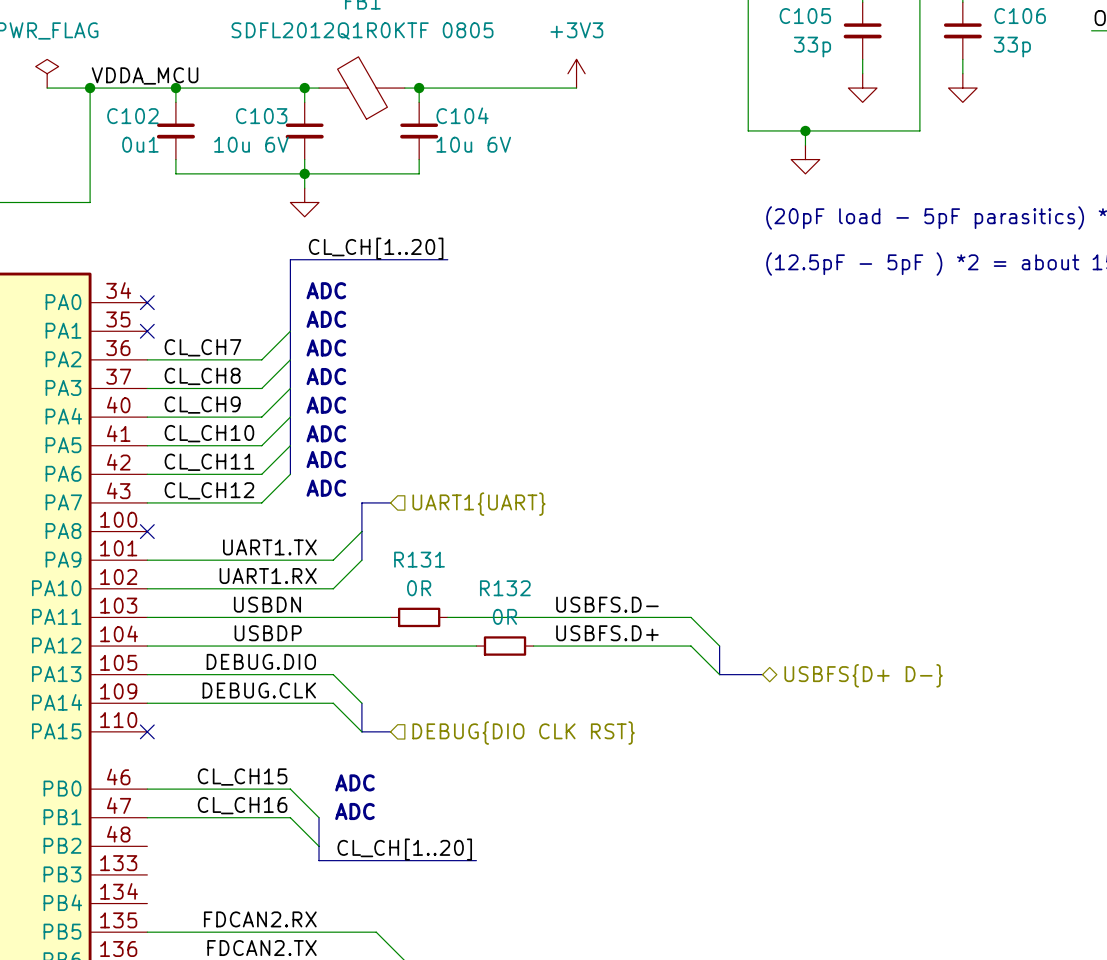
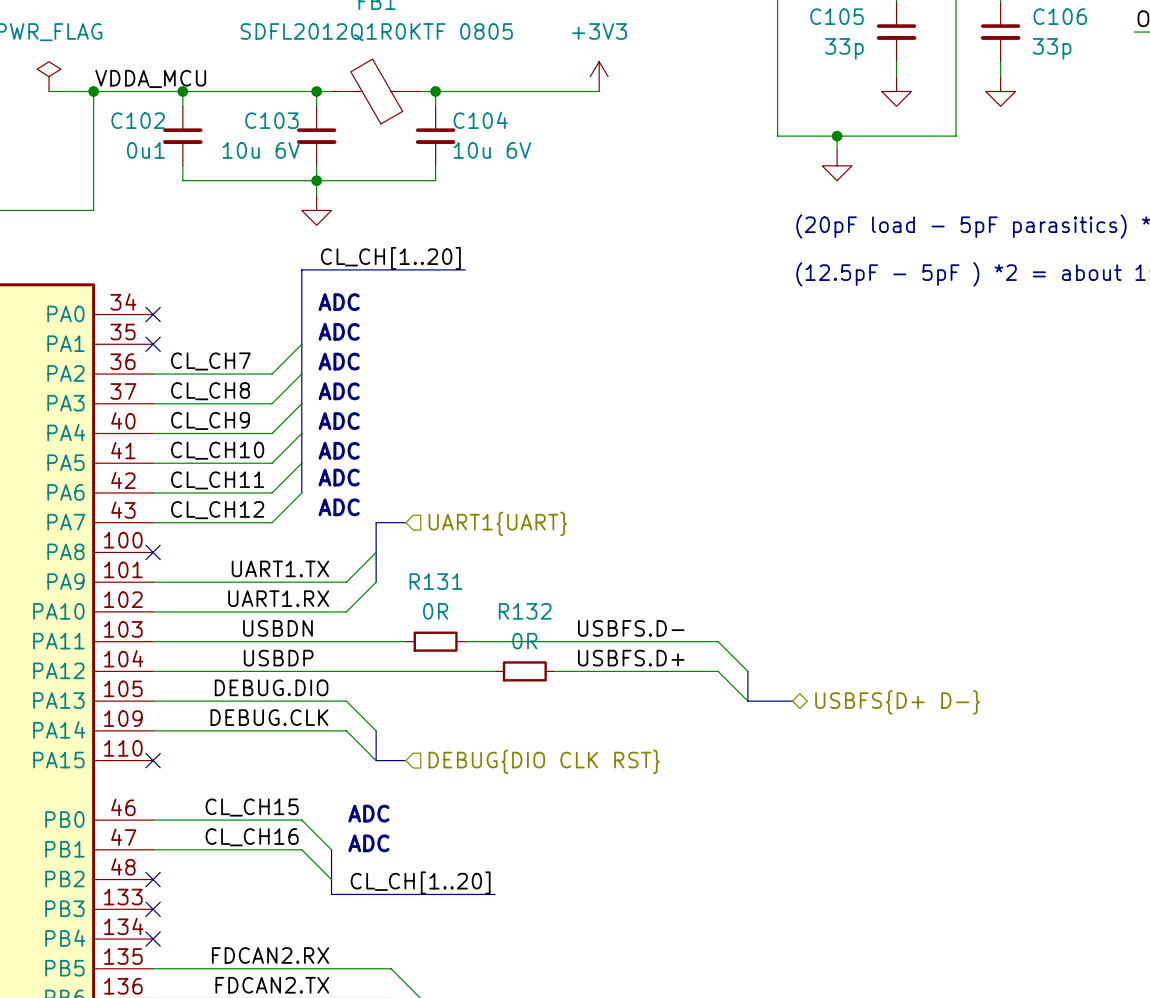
no-connect mark: none -> (153, 879)
no-connect mark: none -> (153, 909)
no-connect mark: none -> (153, 939)

